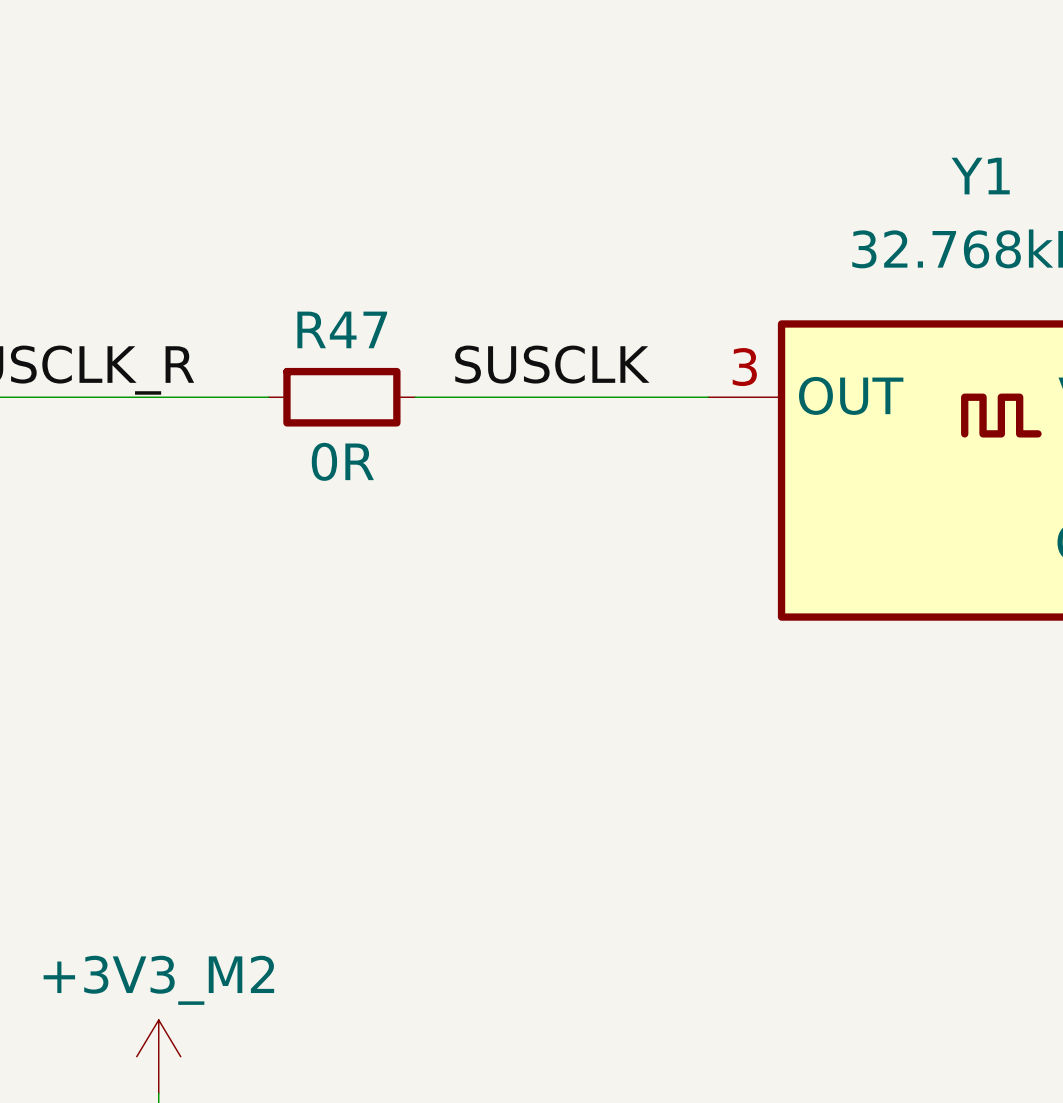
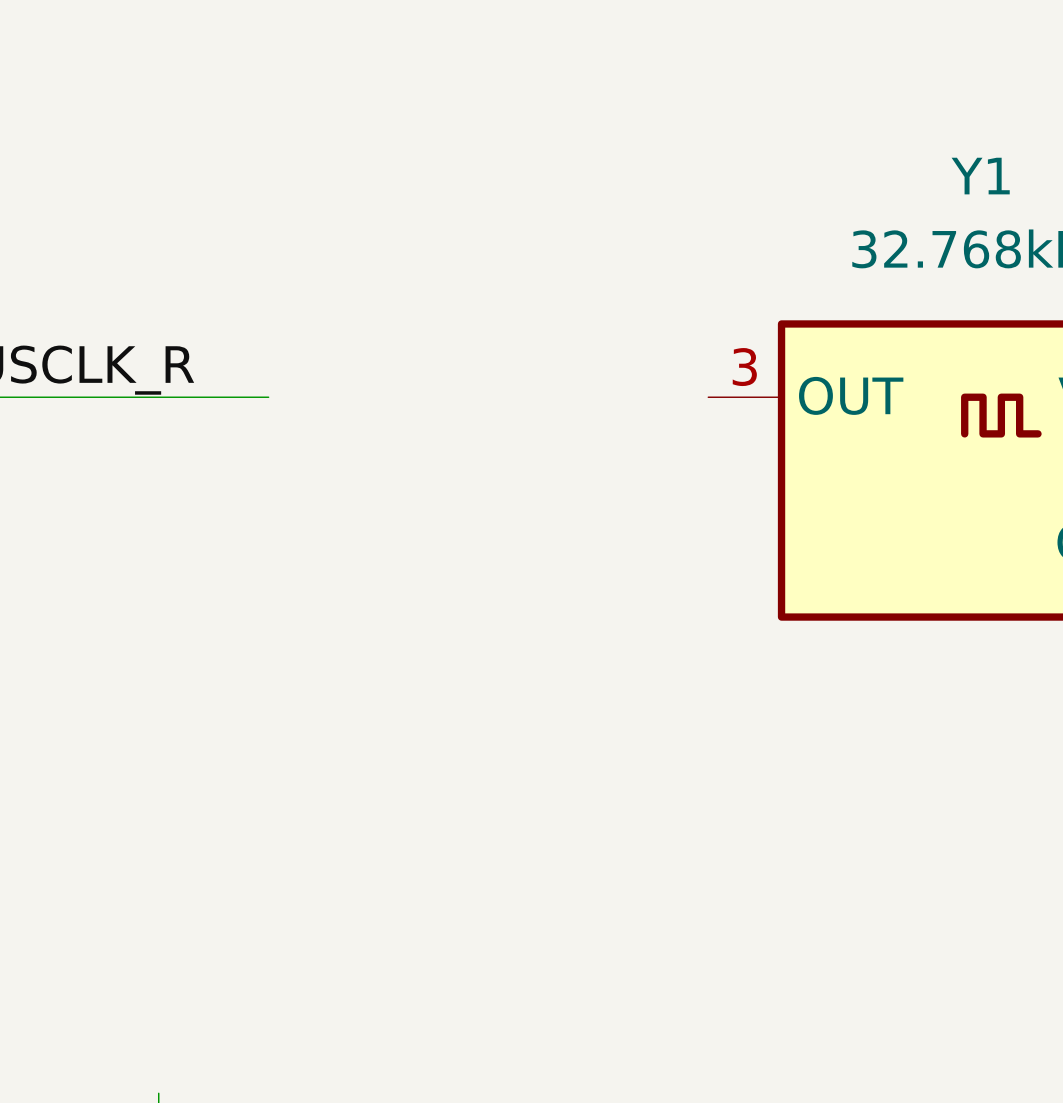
label: SUSCLK (552, 364) -> none
R47: (341, 397) -> none
wire: (415, 397) (708, 397) -> none
power symbol: +3V3_M2 (158, 1056) -> none

